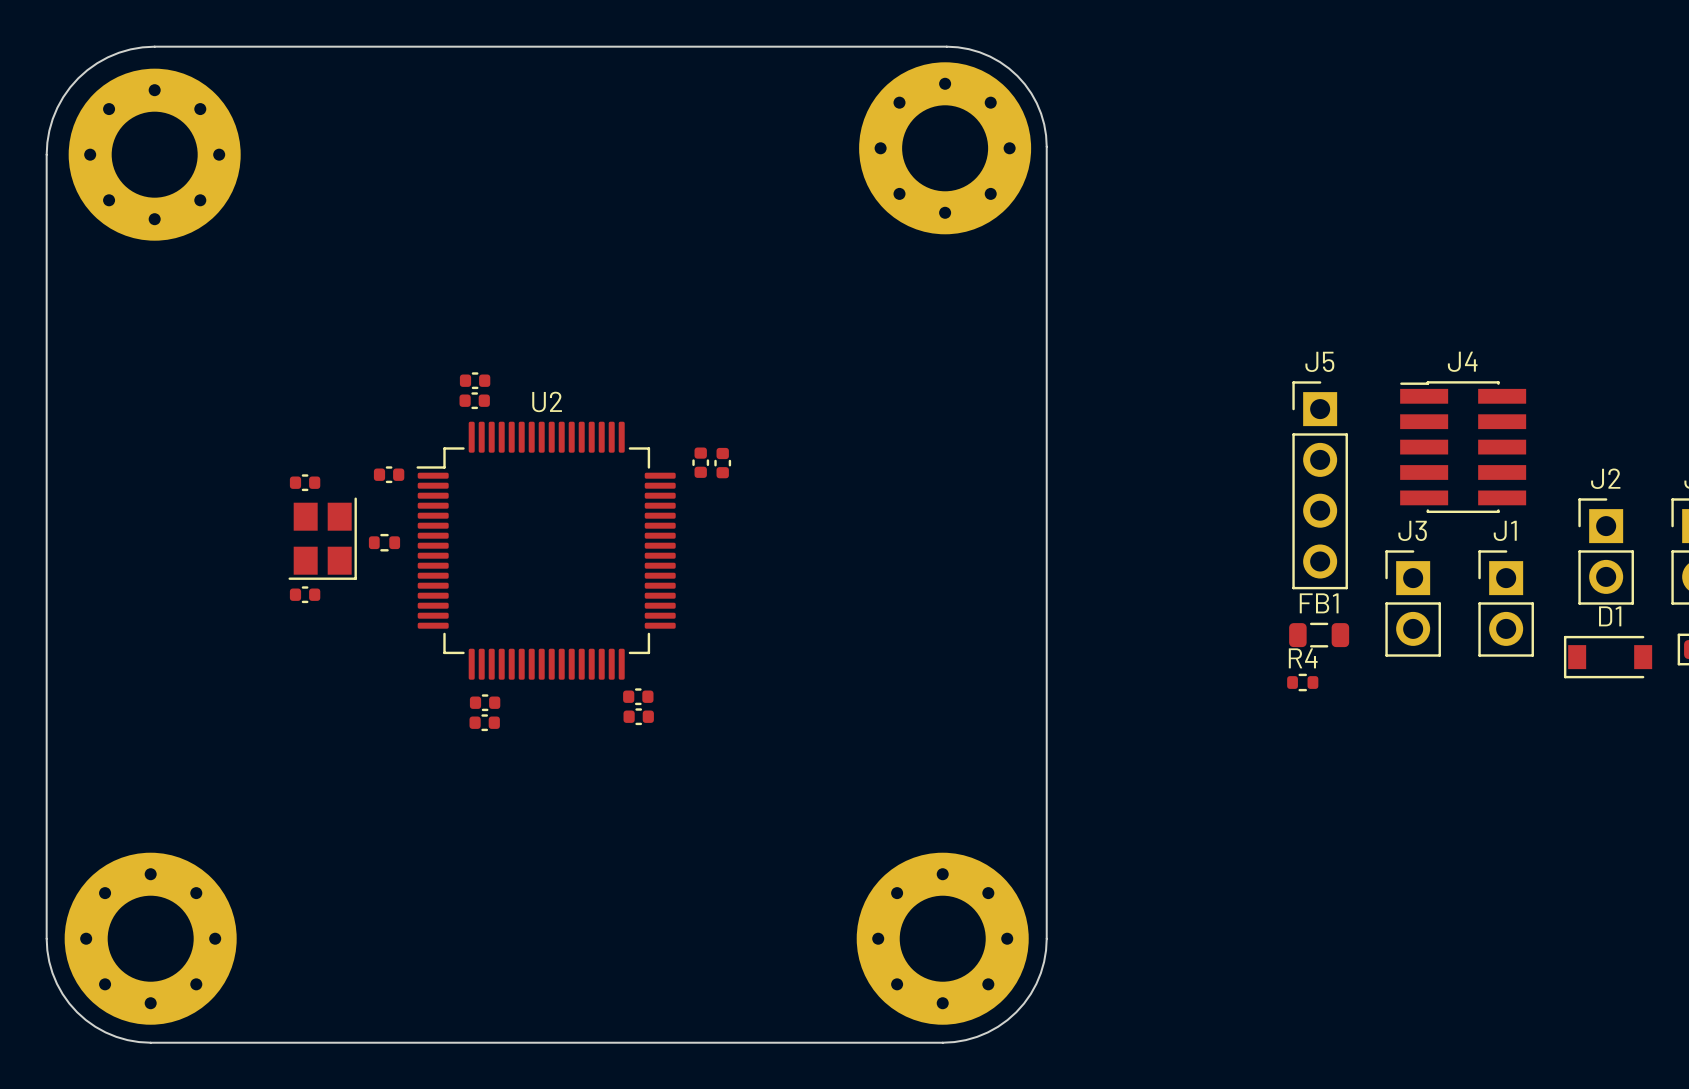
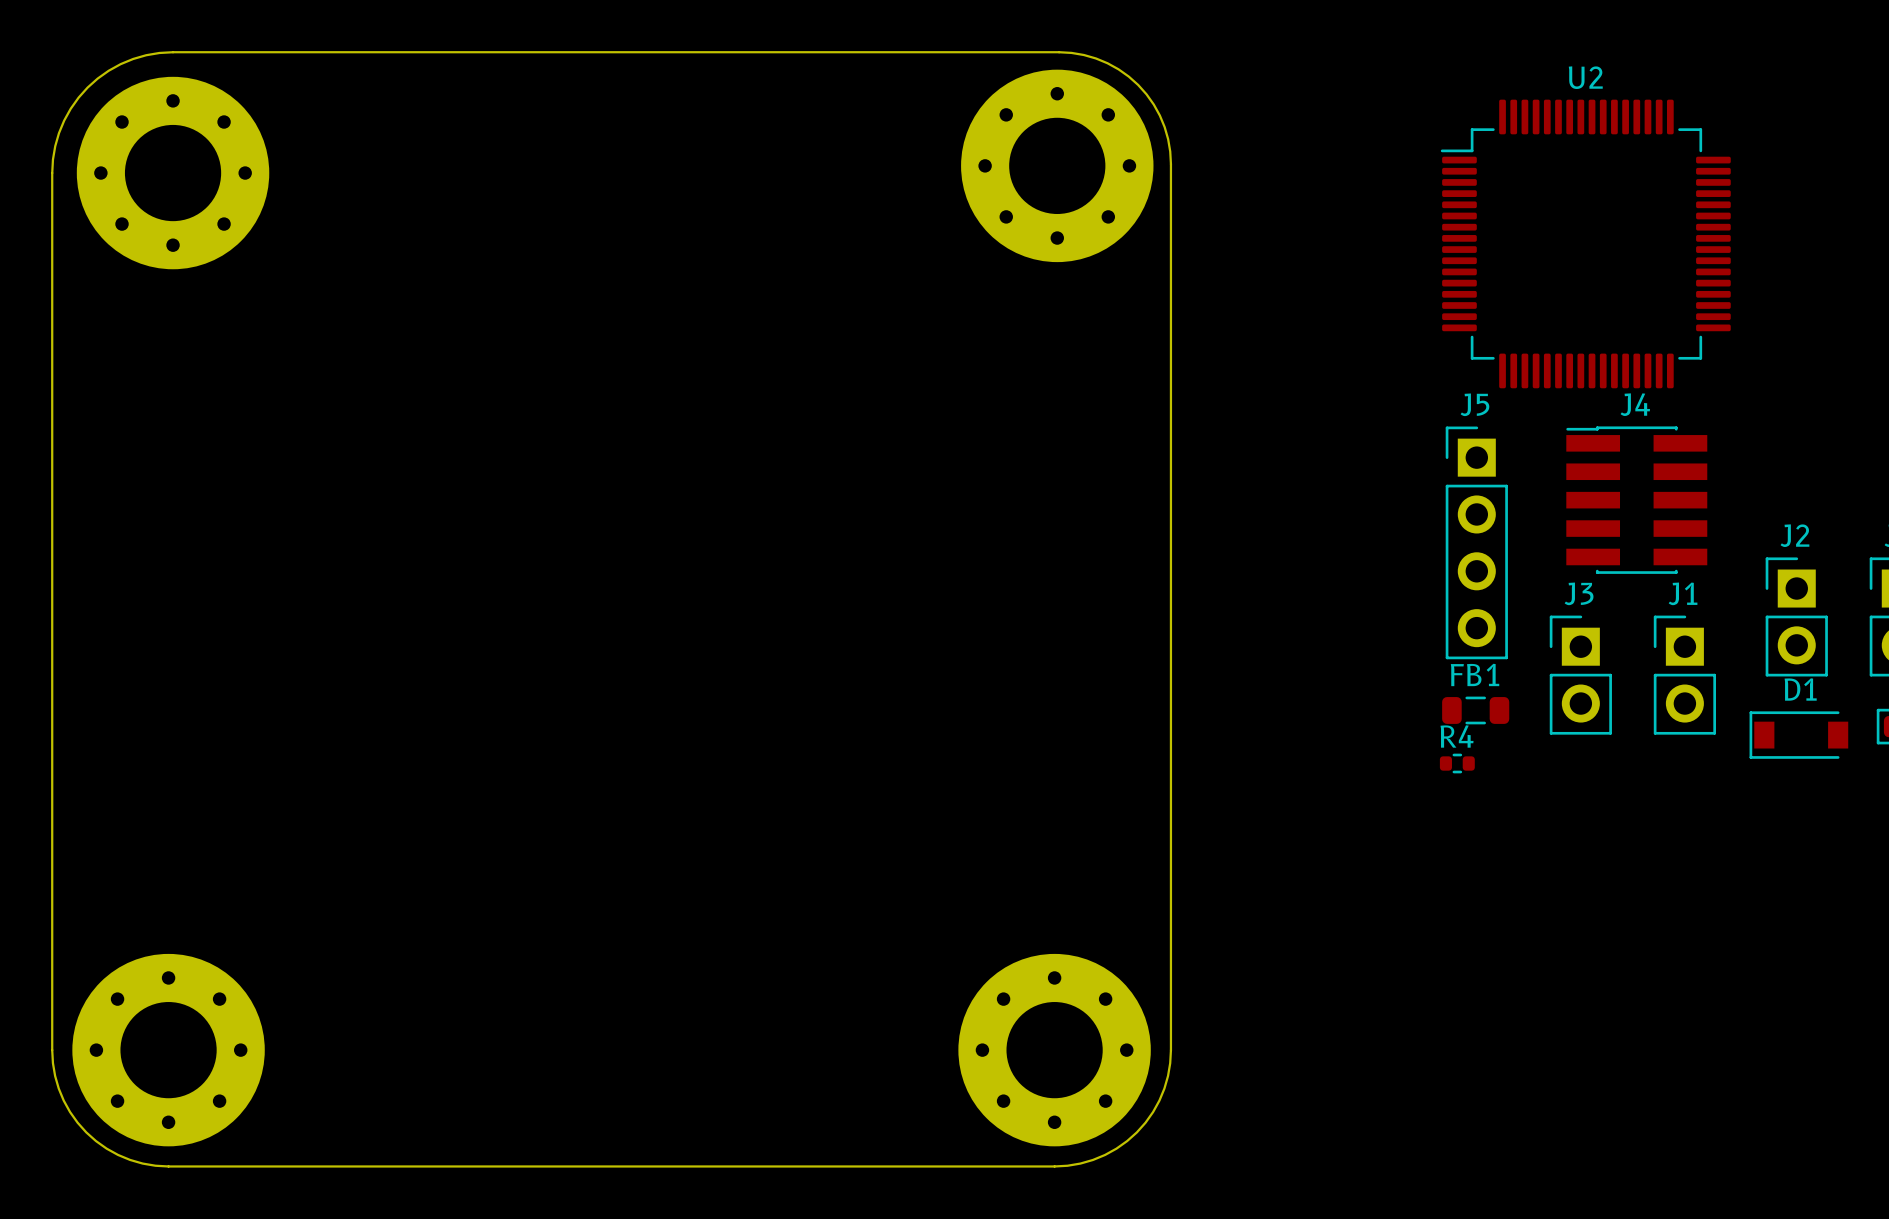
part: (475, 380) -> none
part: (474, 400) -> none
part: (700, 462) -> none
part: (722, 463) -> none
part: (389, 474) -> none
part: (305, 482) -> none
part: (322, 538) -> none
part: (384, 542) -> none
U2 position: (546, 550) -> (1585, 243)
part: (305, 594) -> none
part: (638, 696) -> none
part: (485, 702) -> none
part: (638, 716) -> none
part: (484, 722) -> none

